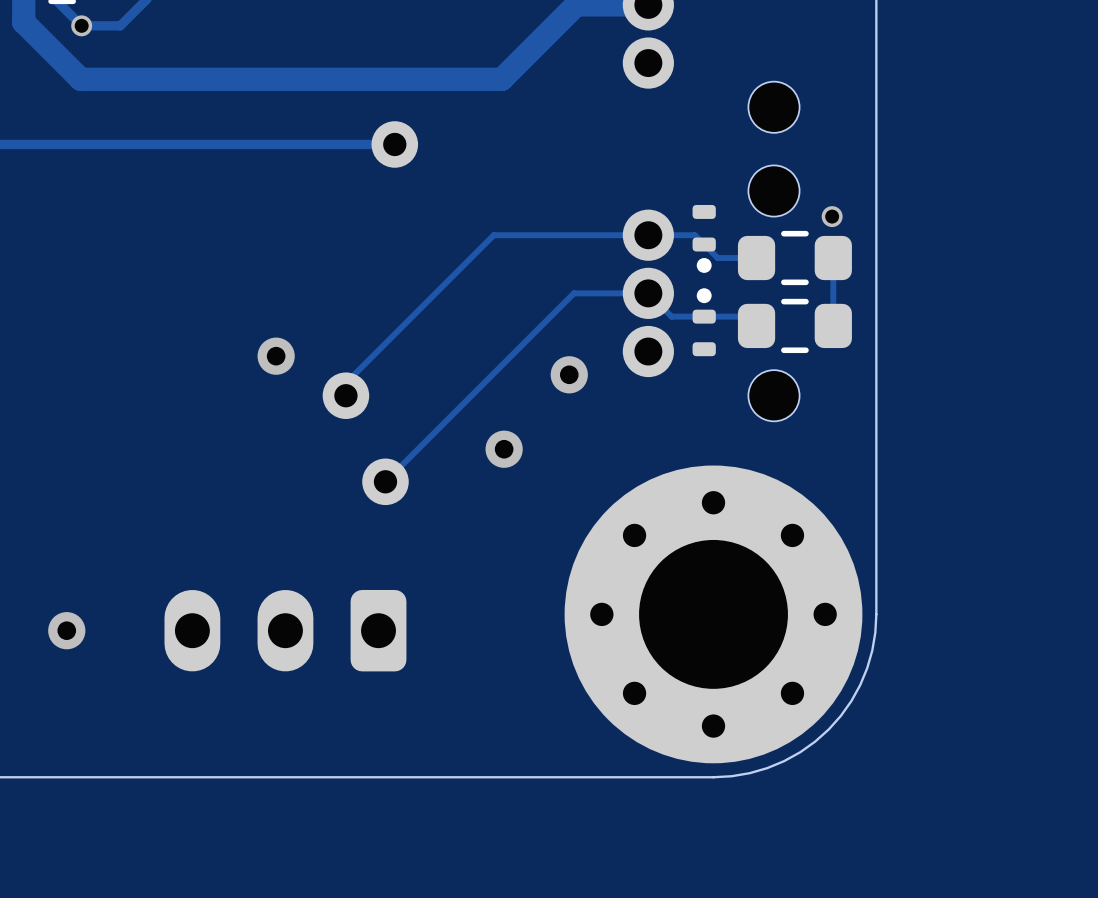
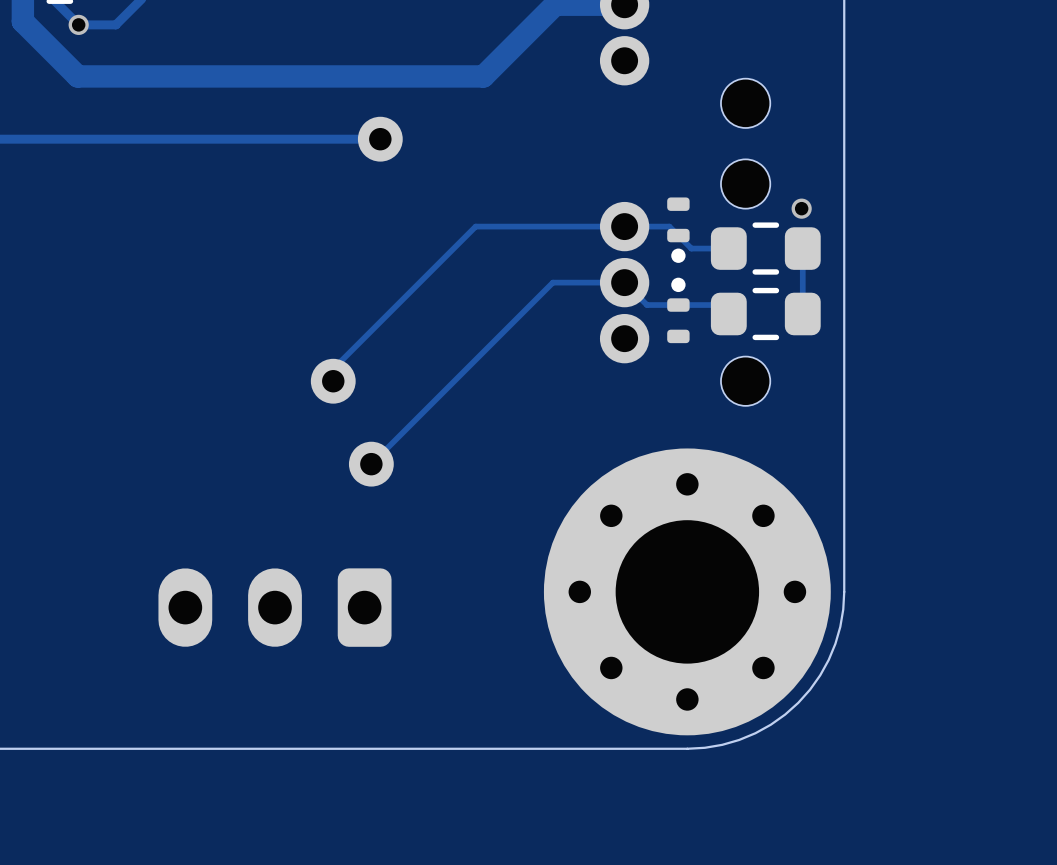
via: (276, 356) -> none
via: (569, 374) -> none
via: (504, 449) -> none
via: (66, 630) -> none

